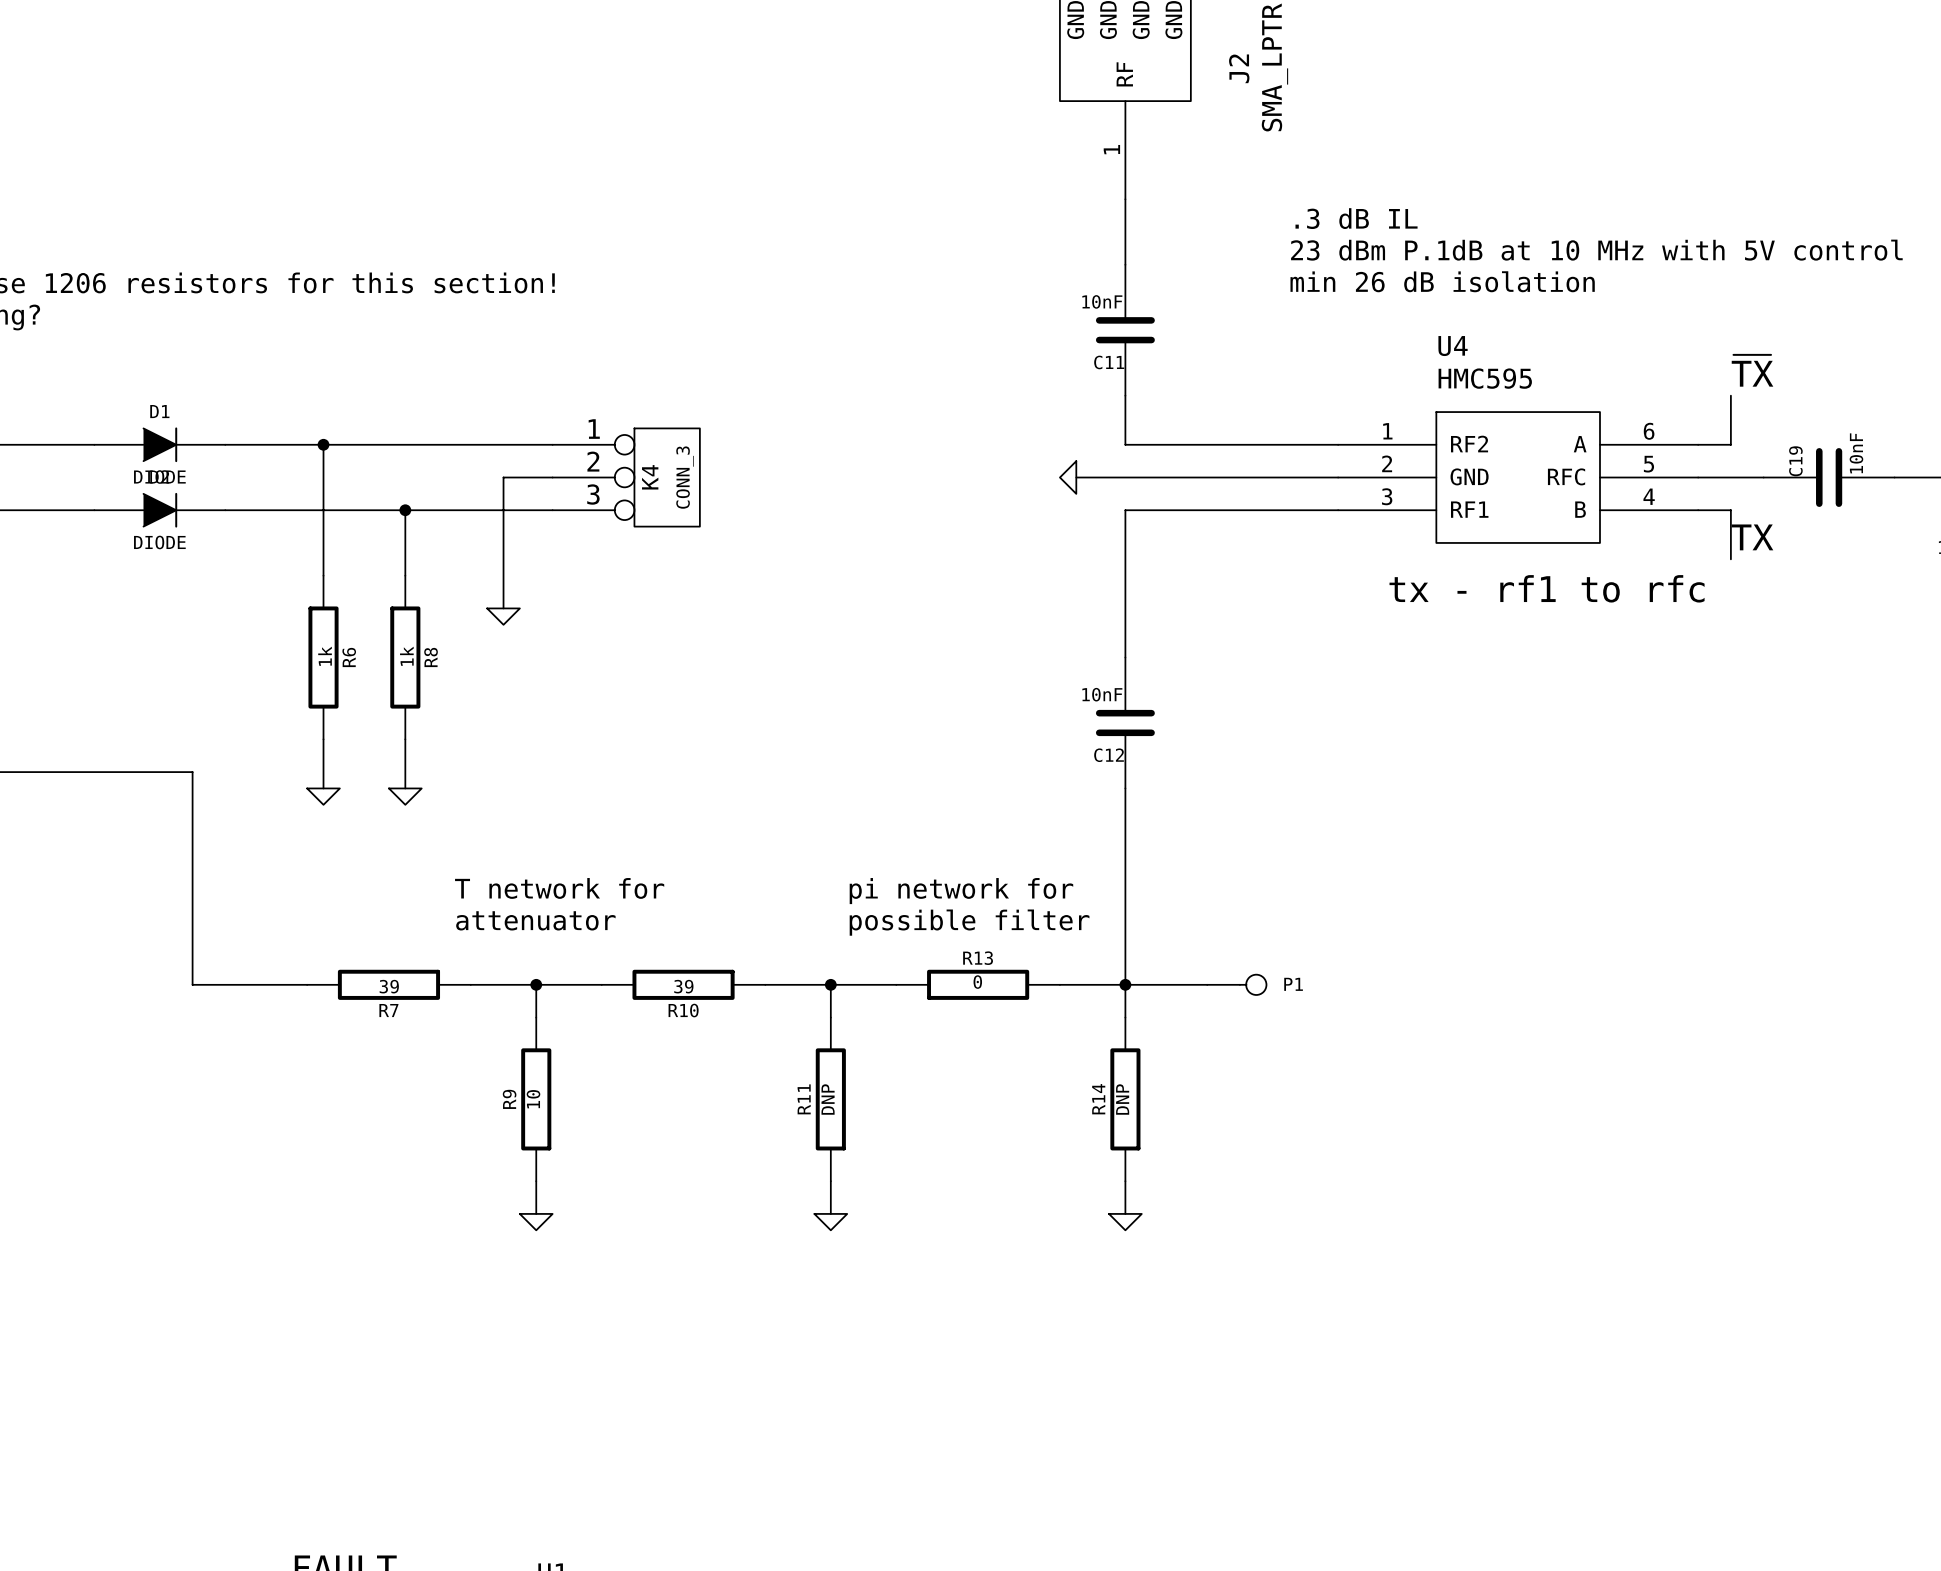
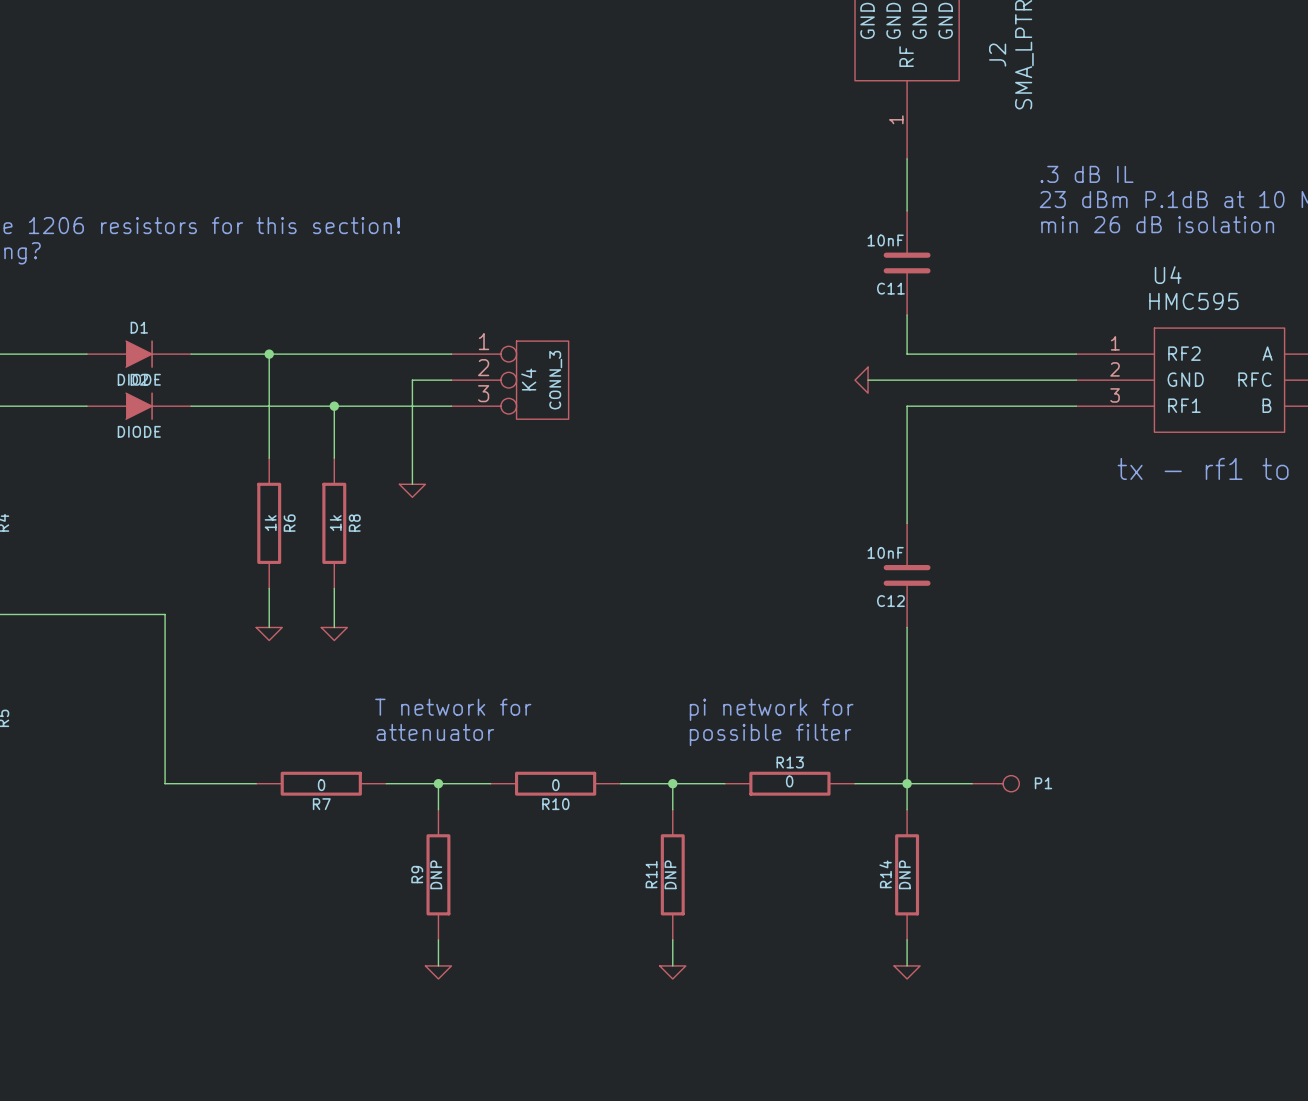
R7 value: 39 (389, 986) -> 0 (321, 785)
R10 value: 39 (683, 986) -> 0 (555, 785)
R9 value: 10 (533, 1099) -> DNP (436, 874)

